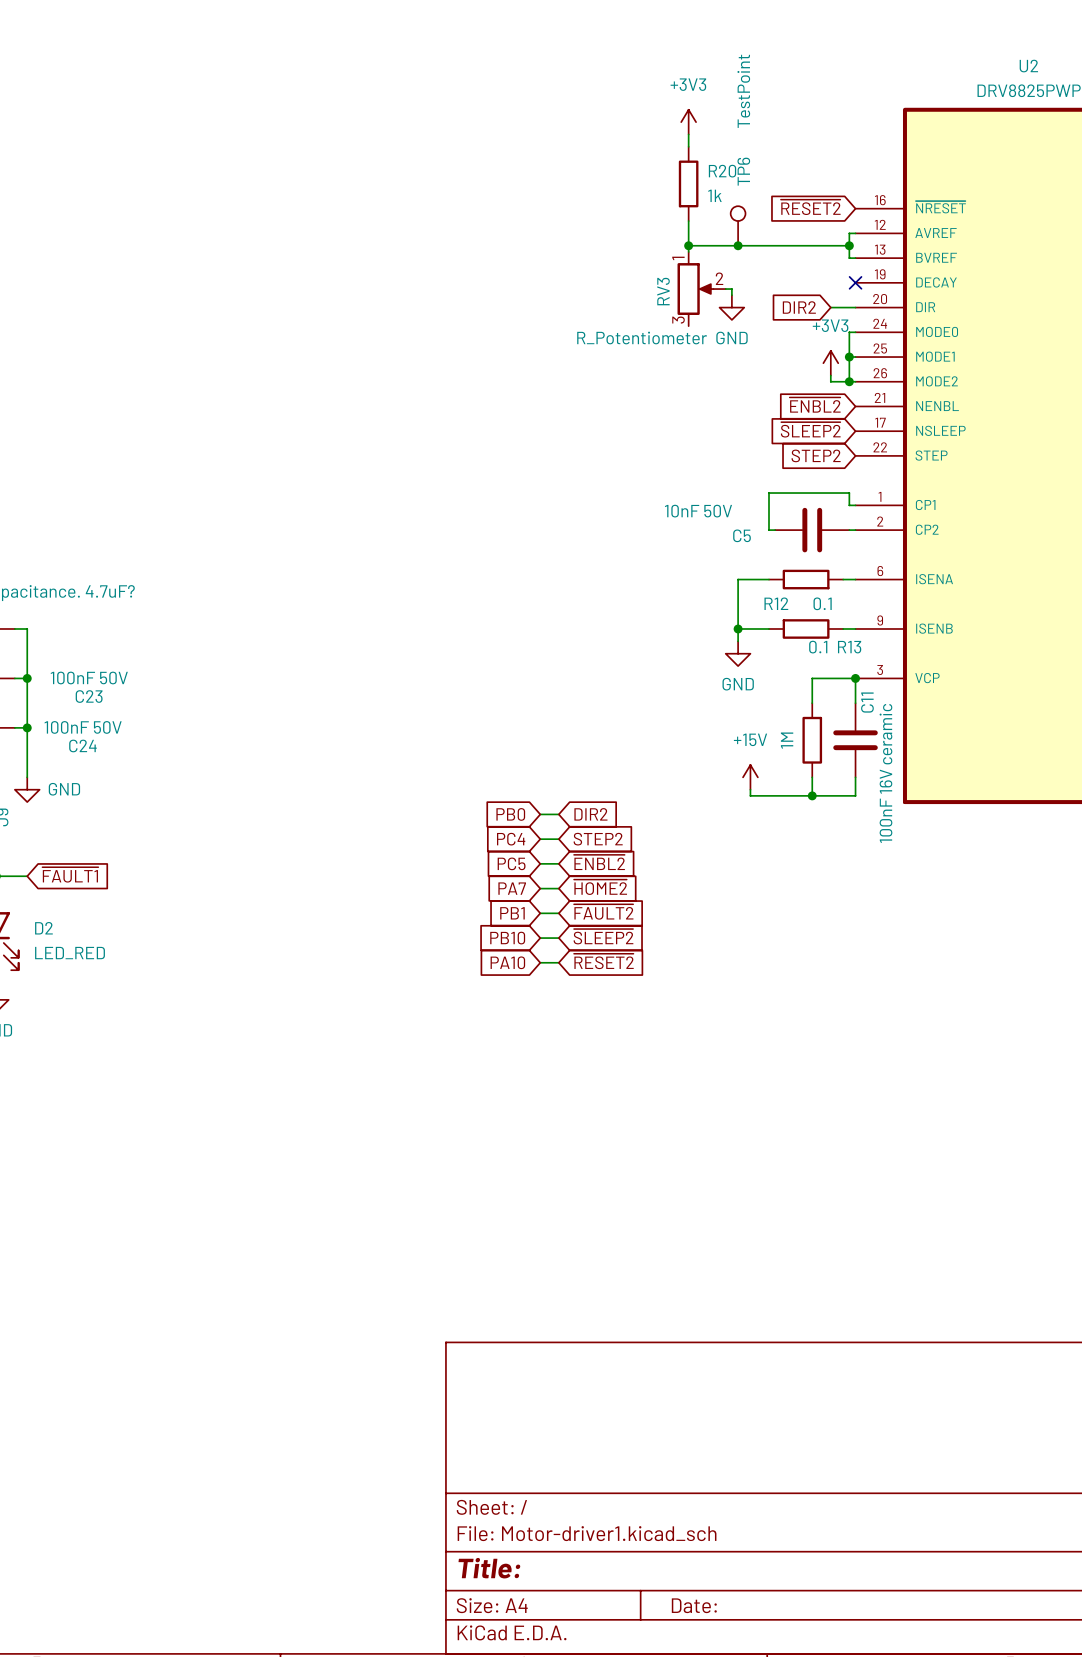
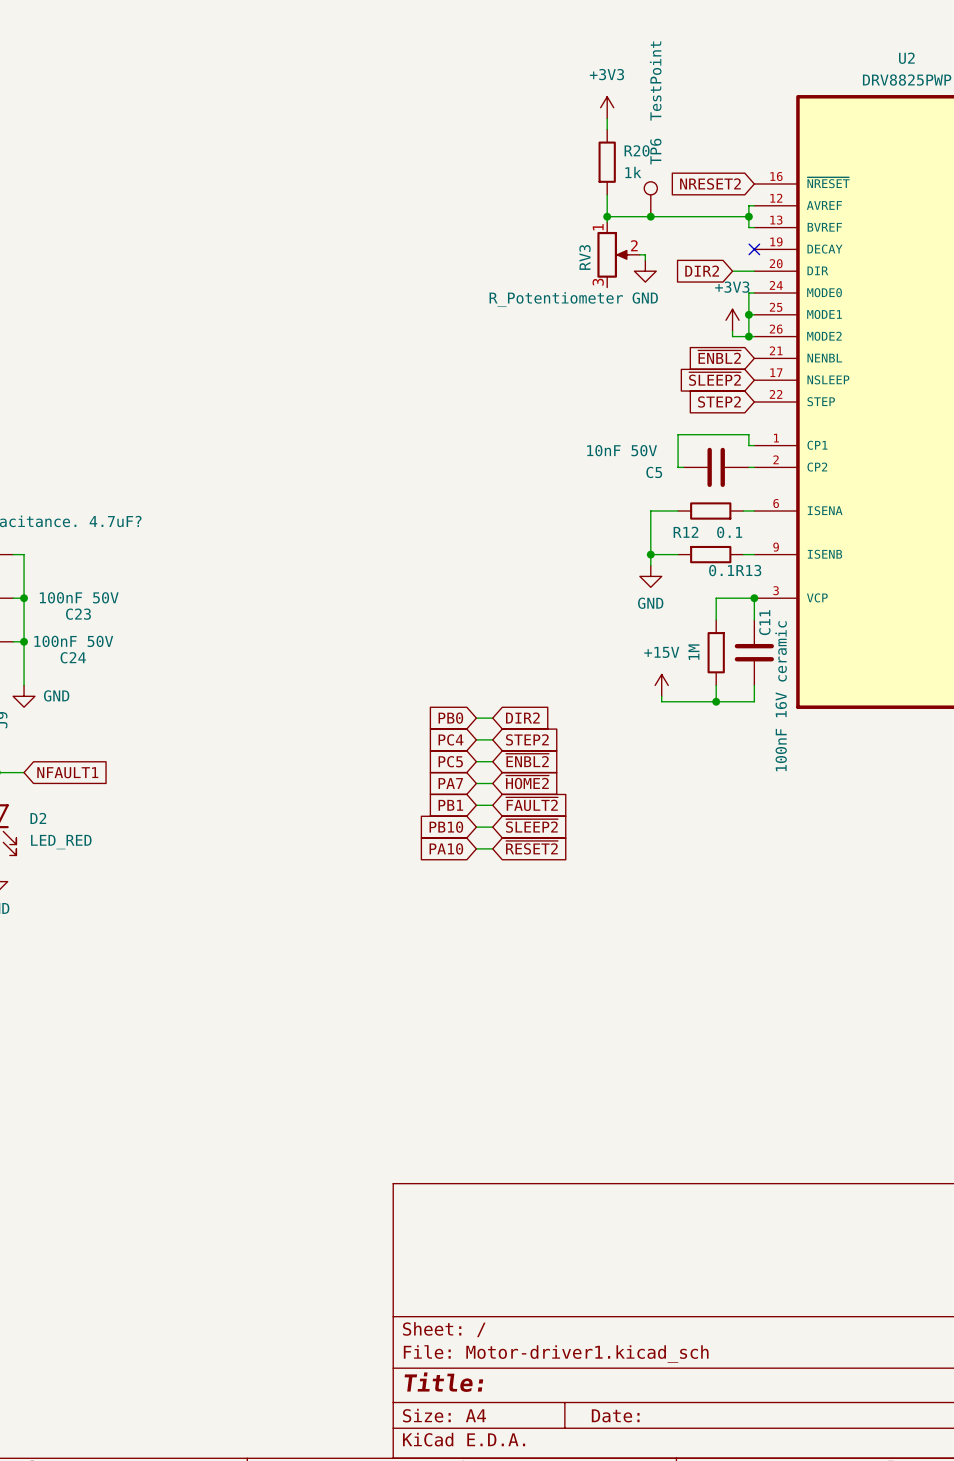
global label: ~{RESET2} (810, 207) -> NRESET2 (710, 184)
global label: ~{FAULT1} (70, 874) -> NFAULT1 (67, 772)

